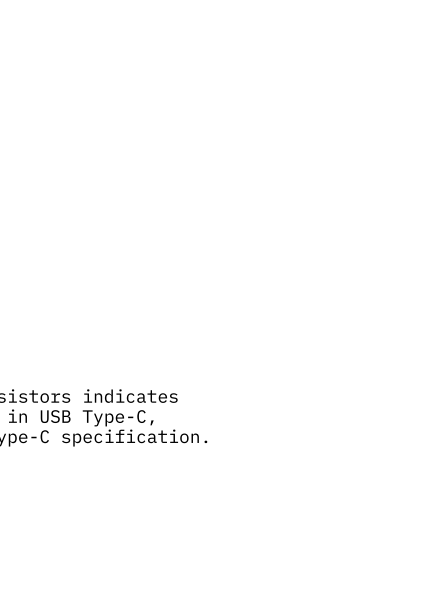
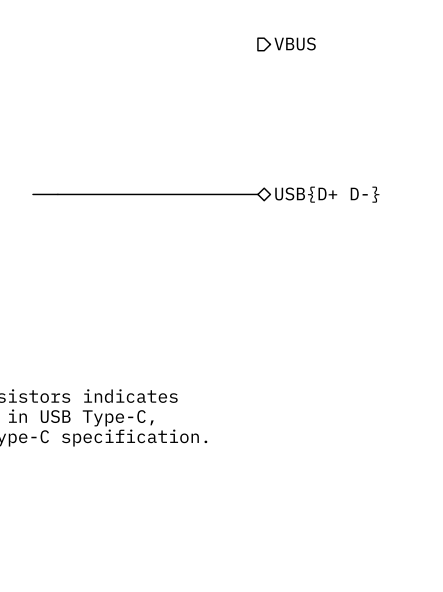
hierarchical label: none -> VBUS (295, 43)
bus: none -> (32, 194) (257, 194)
hierarchical label: none -> USB{D+ D-} (327, 194)

